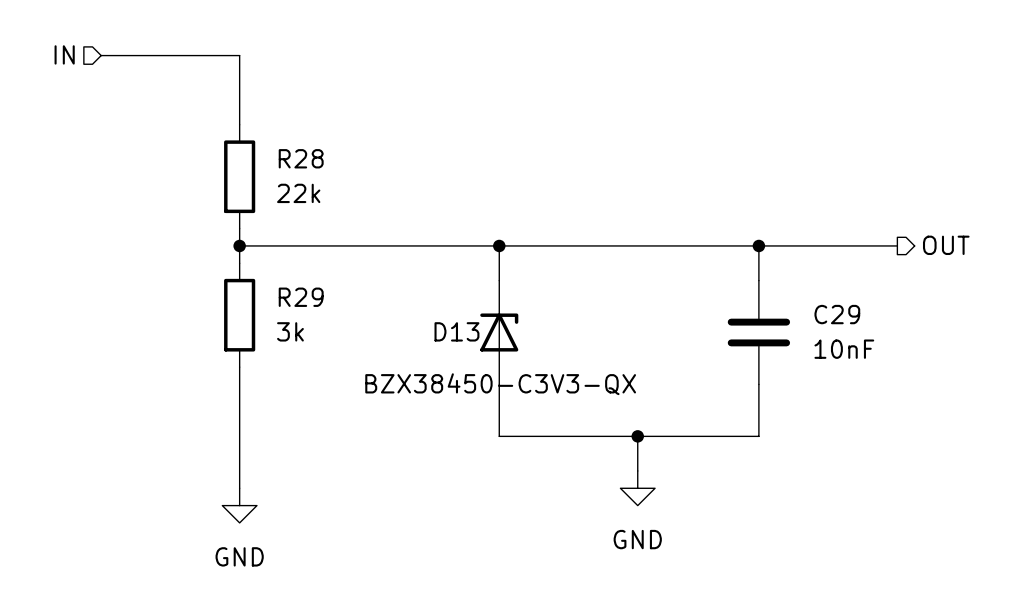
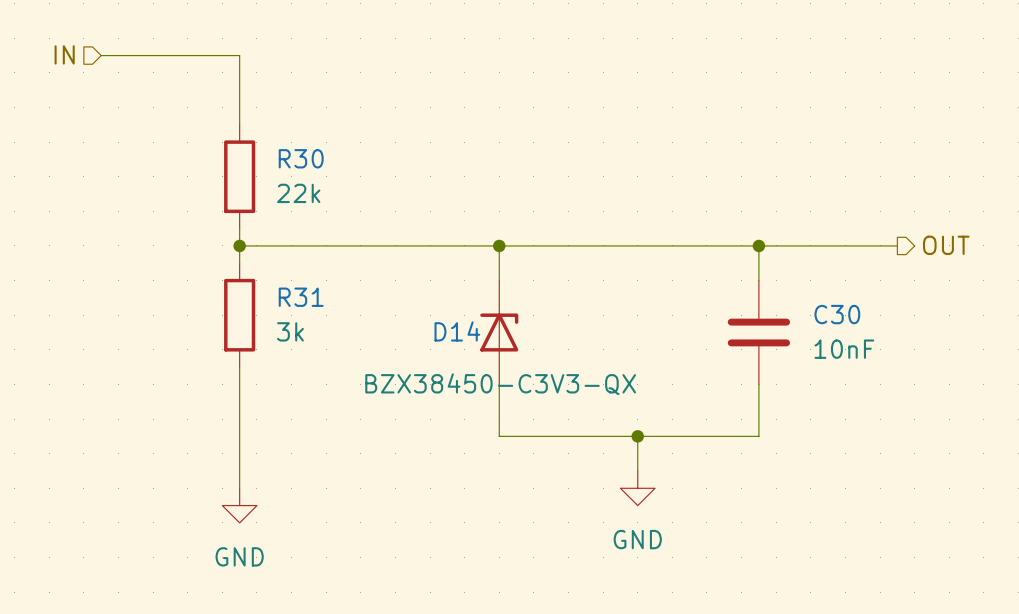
R28 name: R28 (301, 158) -> R30 (301, 158)
R29 name: R29 (301, 297) -> R31 (301, 297)
C29 name: C29 (837, 314) -> C30 (837, 314)
D13 name: D13 (456, 331) -> D14 (457, 331)

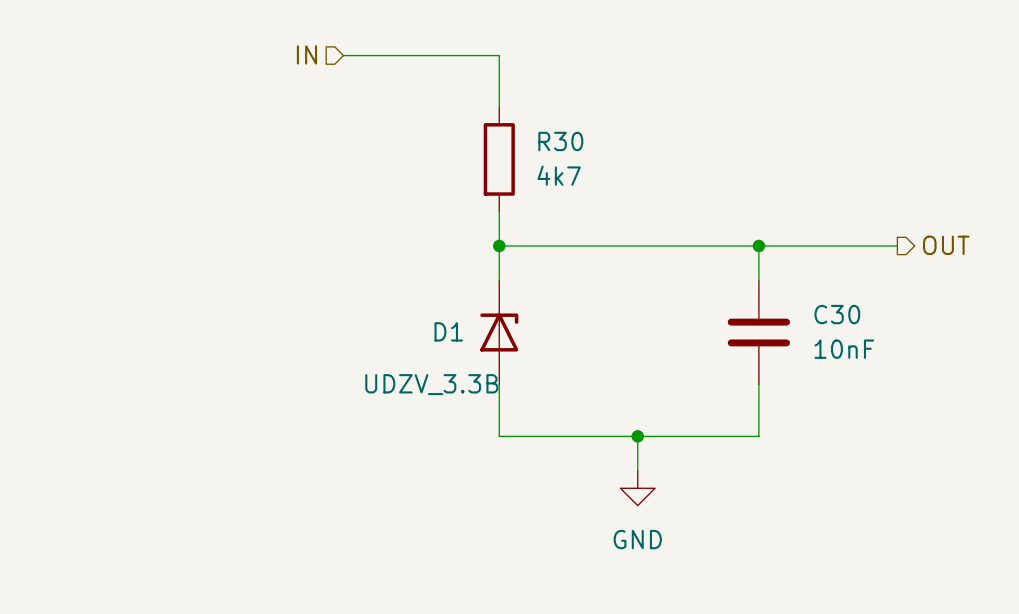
hierarchical label position: IN (64, 54) -> IN (306, 54)
wire: (101, 55) (239, 55) (239, 124) -> none
wire: none -> (343, 55) (499, 55) (499, 107)
R30 position: (239, 176) -> (499, 159)
R30 value: 22k (298, 193) -> 4k7 (559, 175)
wire: (239, 228) (239, 263) -> none
wire: (239, 245) (499, 245) -> (499, 211) (499, 245)
junction: (239, 245) -> none
R31: 3k (239, 315) -> none
D14 name: D14 (457, 331) -> D1 (448, 331)
wire: (239, 367) (239, 488) -> none
D14 value: BZX38450-C3V3-QX (500, 384) -> UDZV_3.3B (431, 384)
power symbol: GND (239, 505) -> none

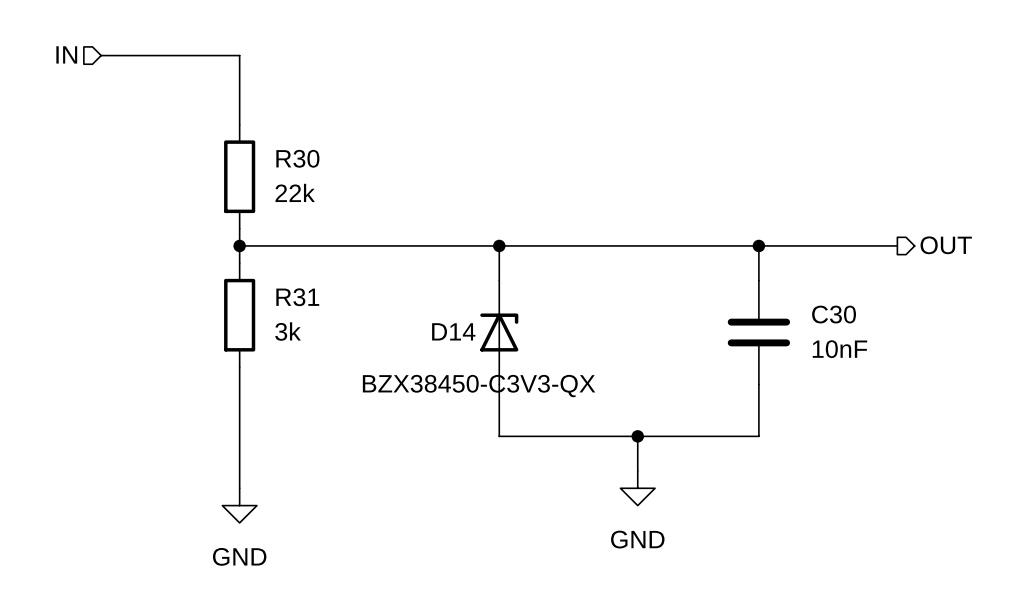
hierarchical label position: IN (306, 54) -> IN (66, 54)
wire: none -> (101, 55) (239, 55) (239, 124)
wire: (343, 55) (499, 55) (499, 107) -> none
R30 position: (499, 159) -> (239, 176)
R30 value: 4k7 (559, 175) -> 22k (295, 192)
wire: (499, 211) (499, 245) -> (239, 245) (499, 245)
wire: none -> (239, 228) (239, 263)
junction: none -> (239, 245)
R31: none -> 3k (239, 315)
D1 name: D1 (448, 331) -> D14 (453, 331)
wire: none -> (239, 367) (239, 488)
D1 value: UDZV_3.3B (431, 384) -> BZX38450-C3V3-QX (479, 386)
power symbol: none -> GND (239, 505)

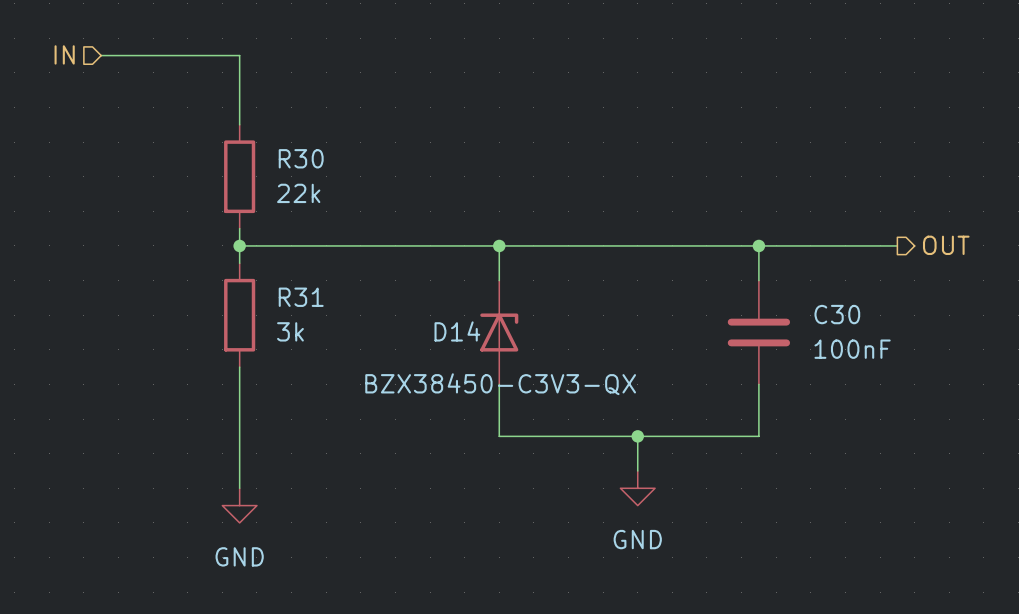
C30 value: 10nF (839, 349) -> 100nF (852, 349)

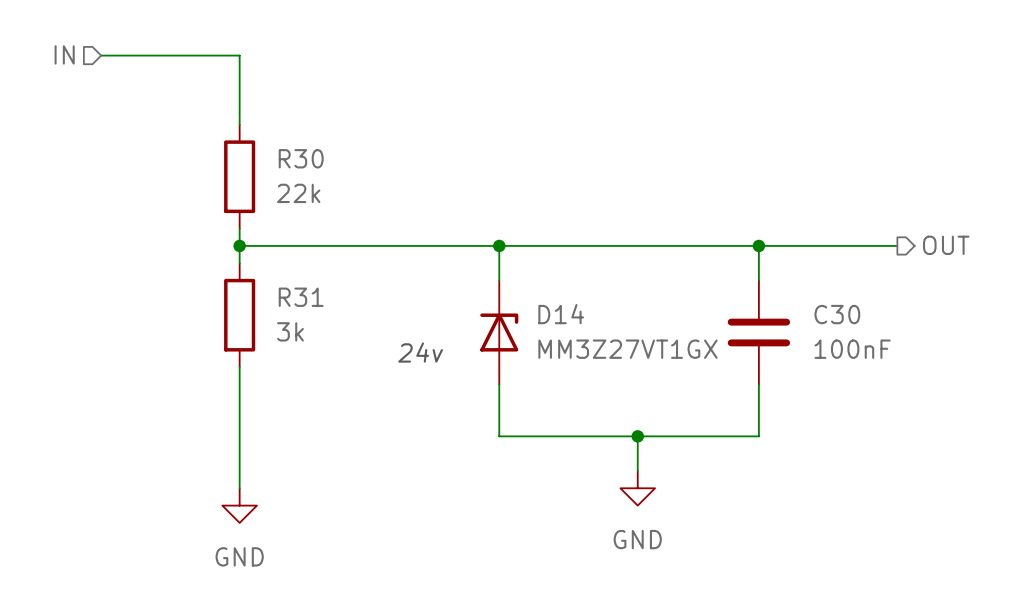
D14 name position: D14 (457, 331) -> D14 (561, 314)
text: none -> 24v (420, 352)
D14 value: BZX38450-C3V3-QX (500, 384) -> MM3Z27VT1GX (627, 349)

